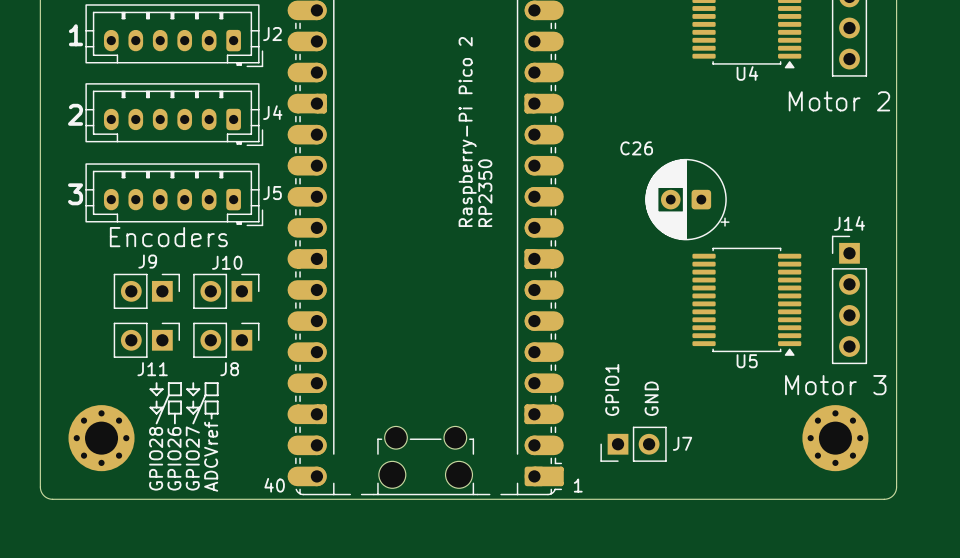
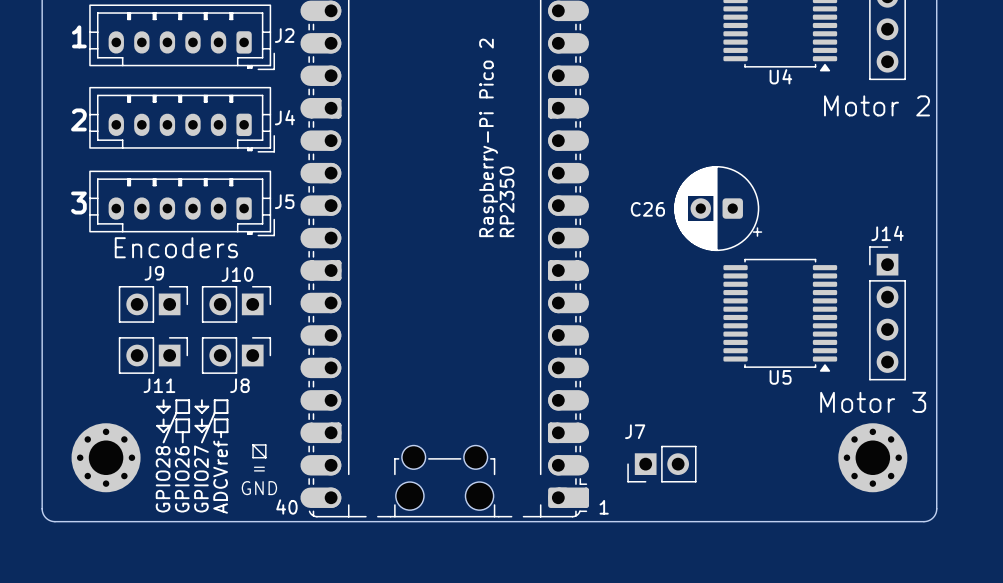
C26 name position: C26 (636, 148) -> C26 (647, 209)
text: GPIO1 (612, 389) -> none
text: GND (651, 398) -> none
line: none -> (253, 444) (265, 457)
line: none -> (253, 444) (265, 444) (265, 457)
line: none -> (253, 444) (253, 457) (265, 457)
J7 name position: J7 (682, 443) -> J7 (635, 431)
text: none -> = (259, 469)
text: none -> GND (259, 488)

